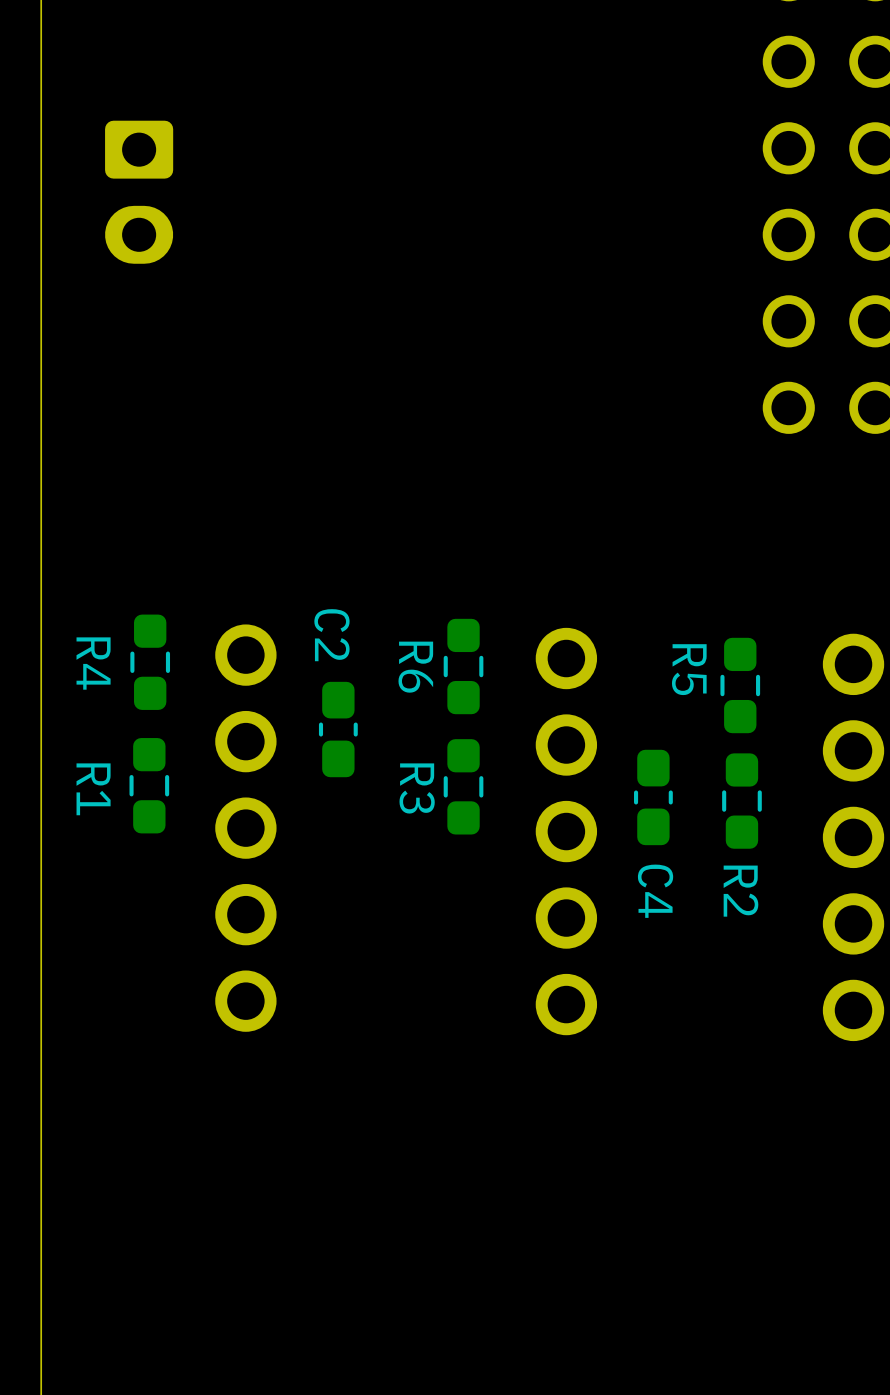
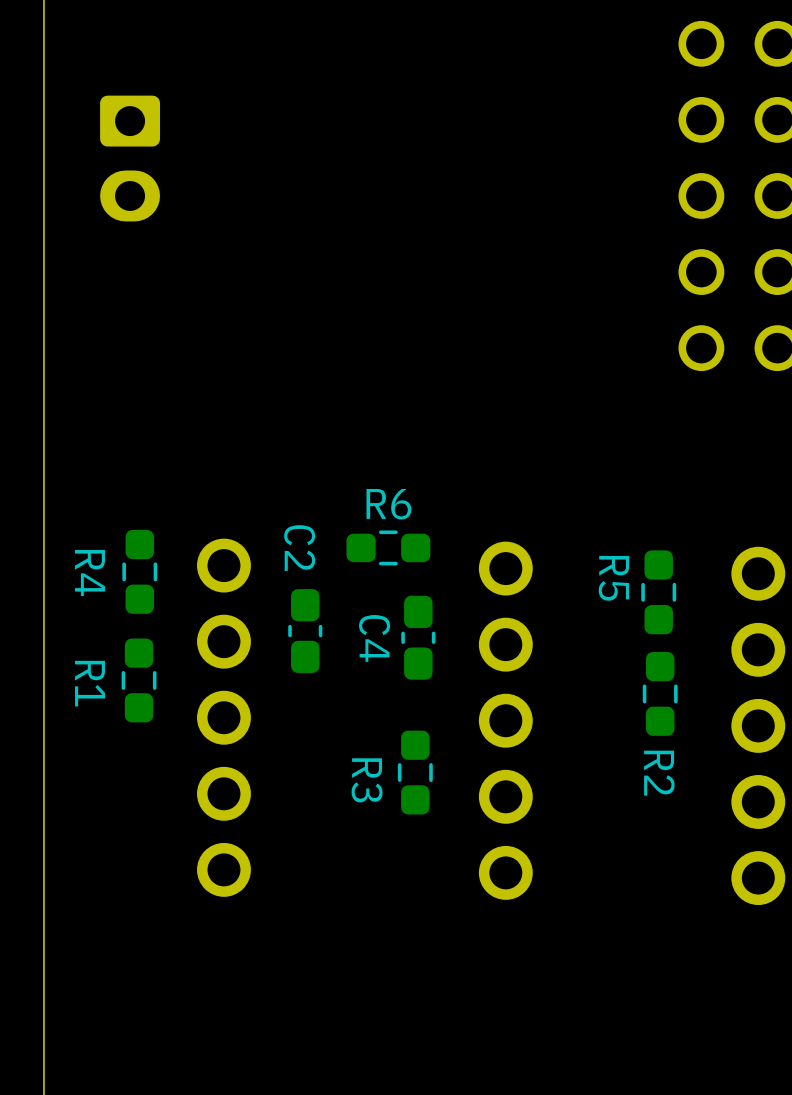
R6 rotation: 0° (463, 666) -> 90° clockwise (388, 547)
R3 position: (463, 786) -> (415, 772)
R3 name position: R3 (417, 788) -> R3 (367, 780)
C4 position: (653, 797) -> (418, 637)
C4 name position: C4 (655, 891) -> C4 (374, 638)

